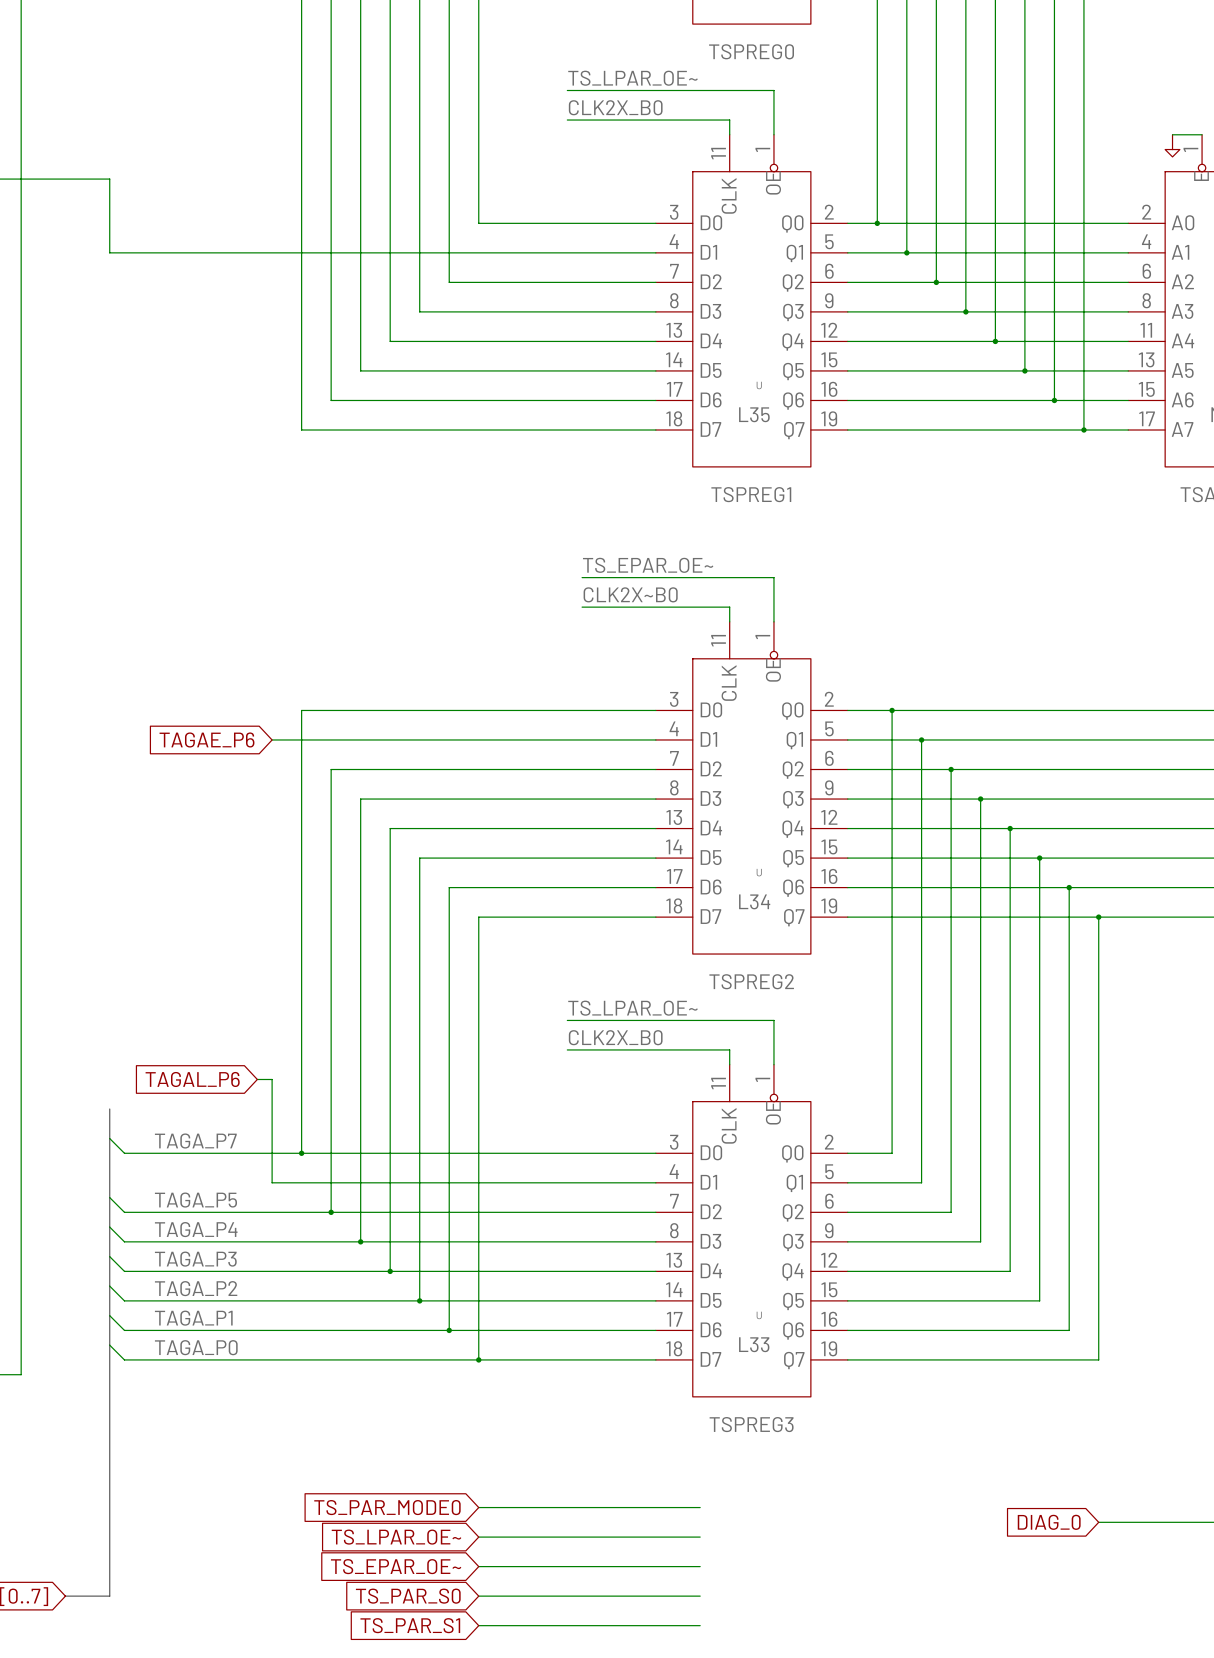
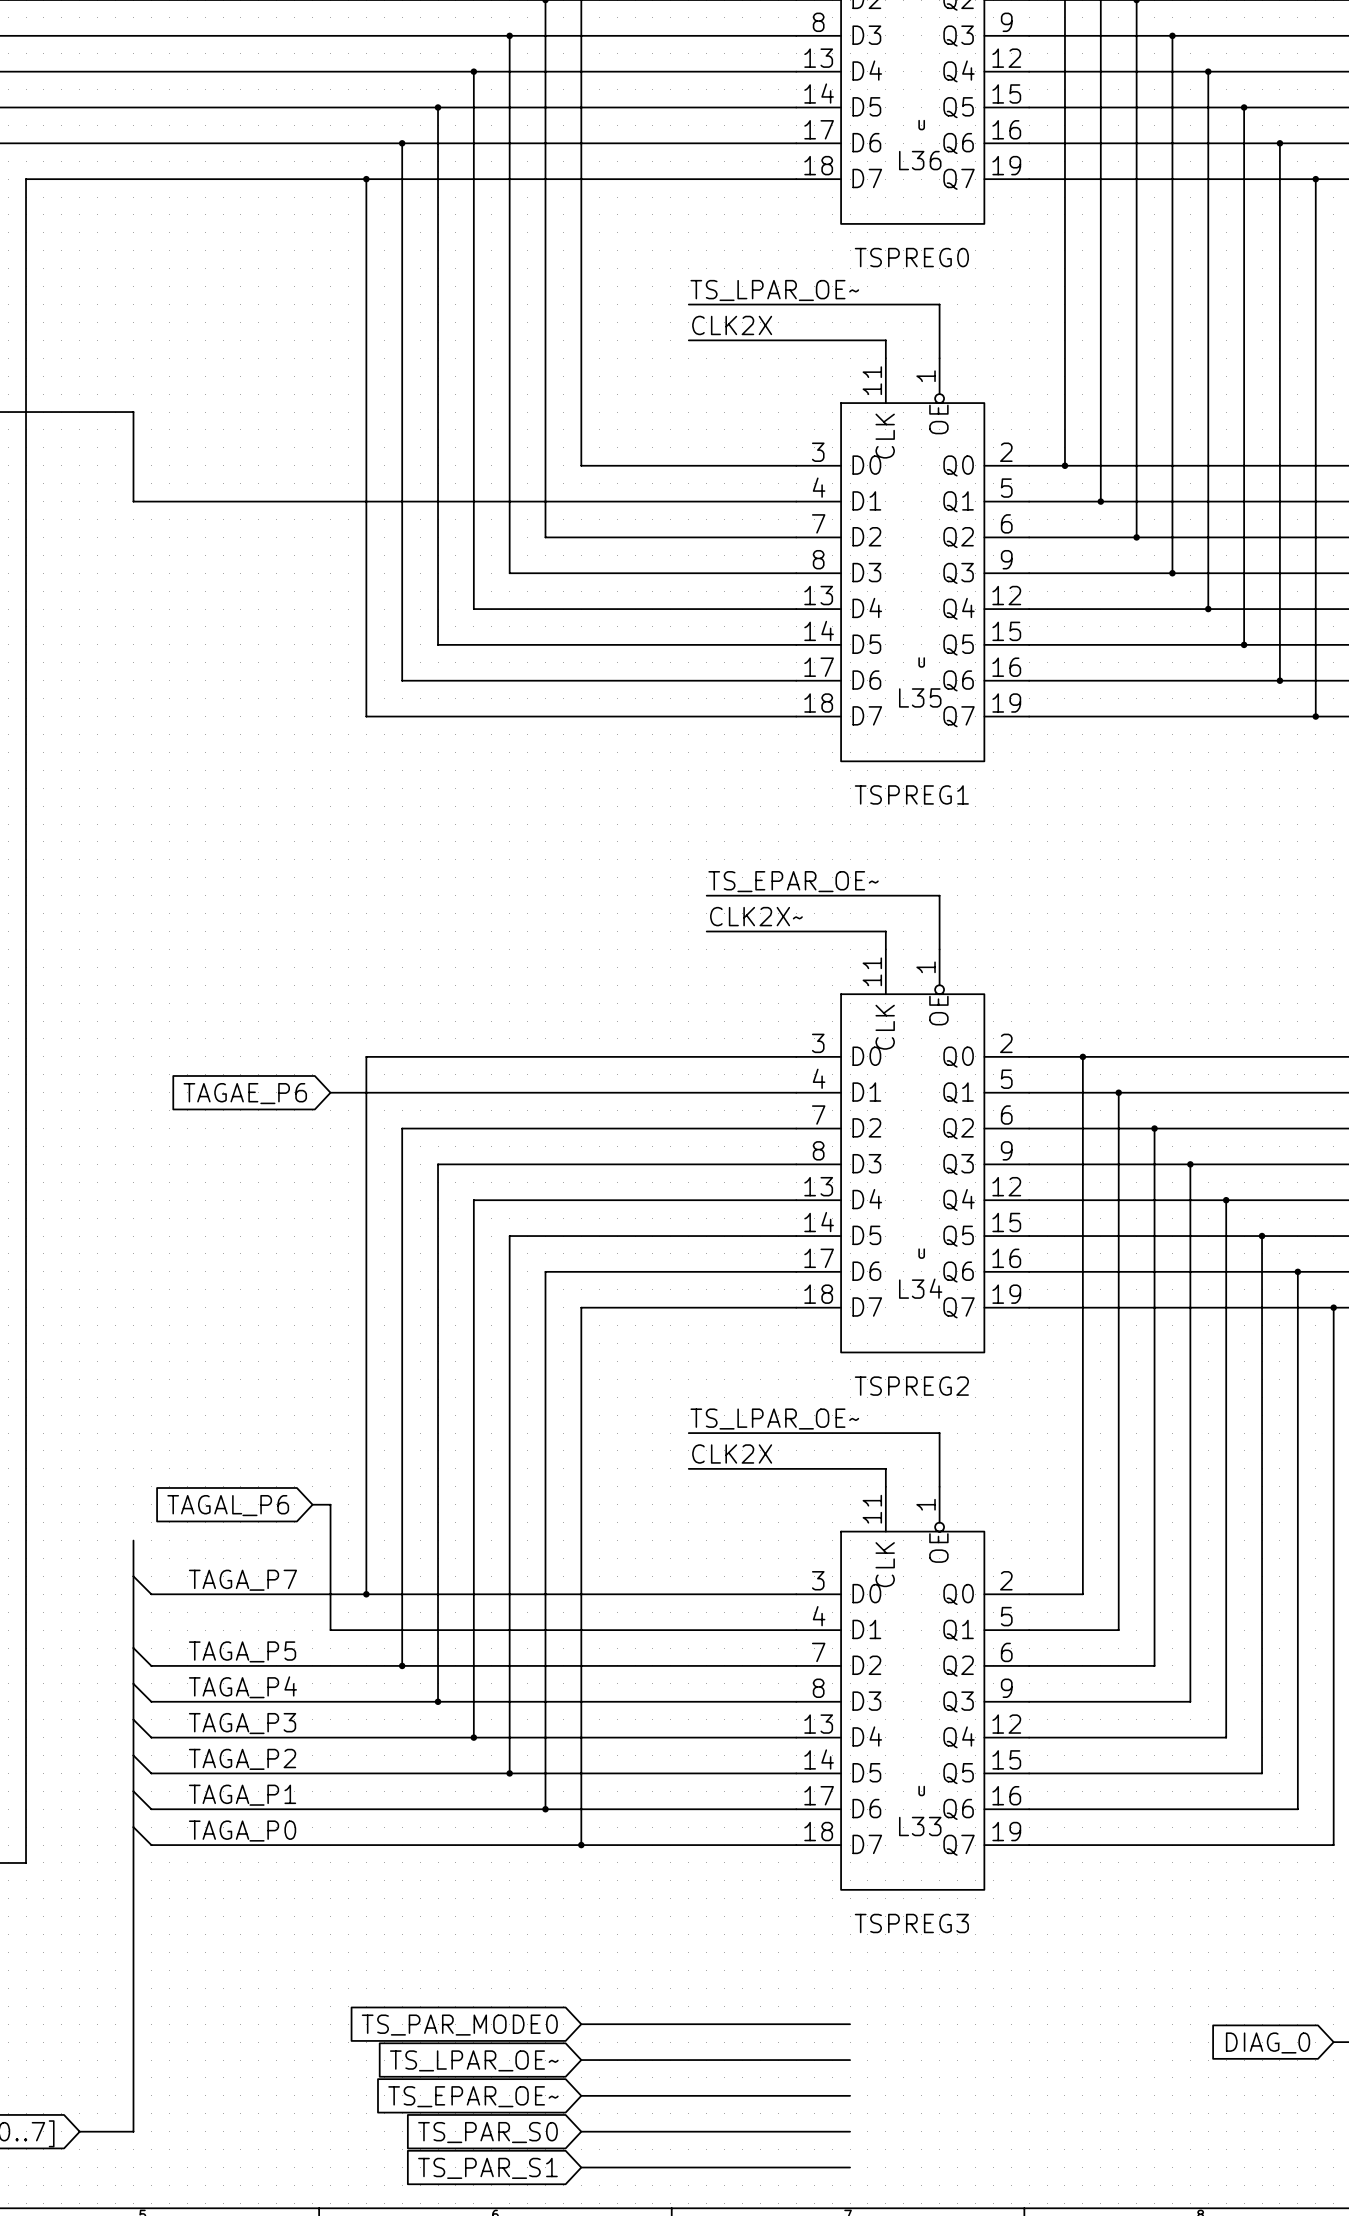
label: CLK2X_B0 (615, 107) -> CLK2X (732, 325)
label: CLK2X~B0 (630, 594) -> CLK2X~ (756, 916)
label: CLK2X_B0 (615, 1037) -> CLK2X (732, 1453)

